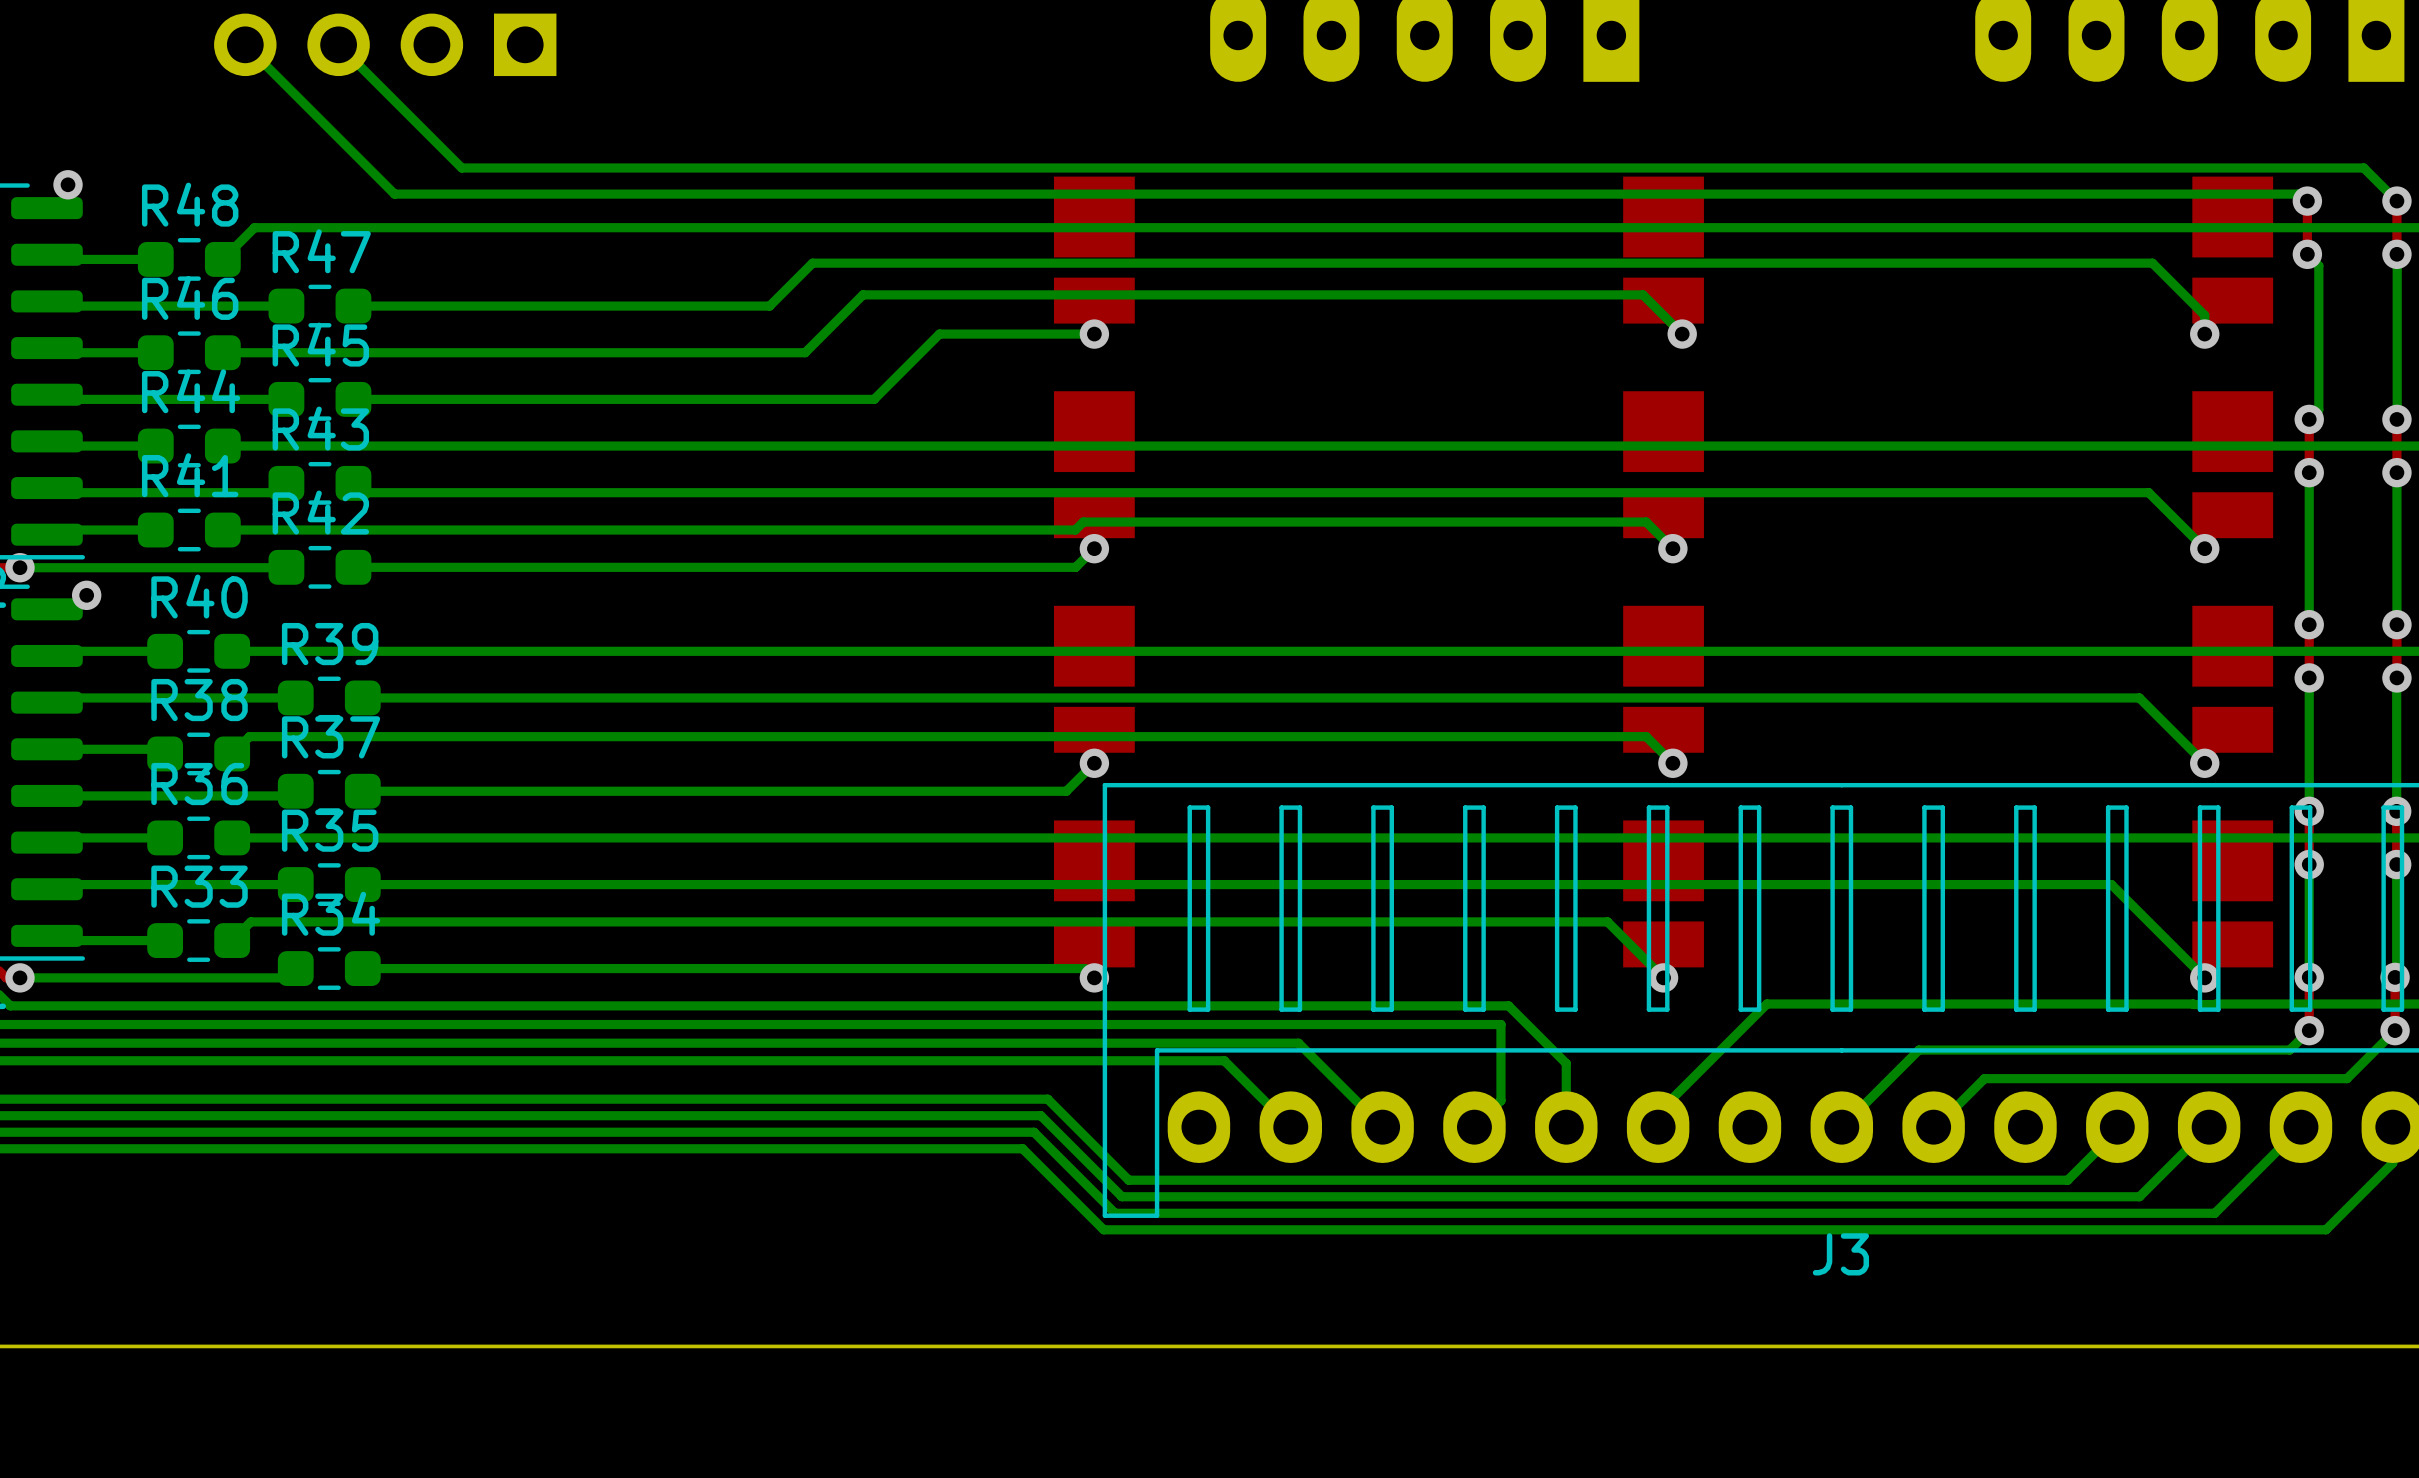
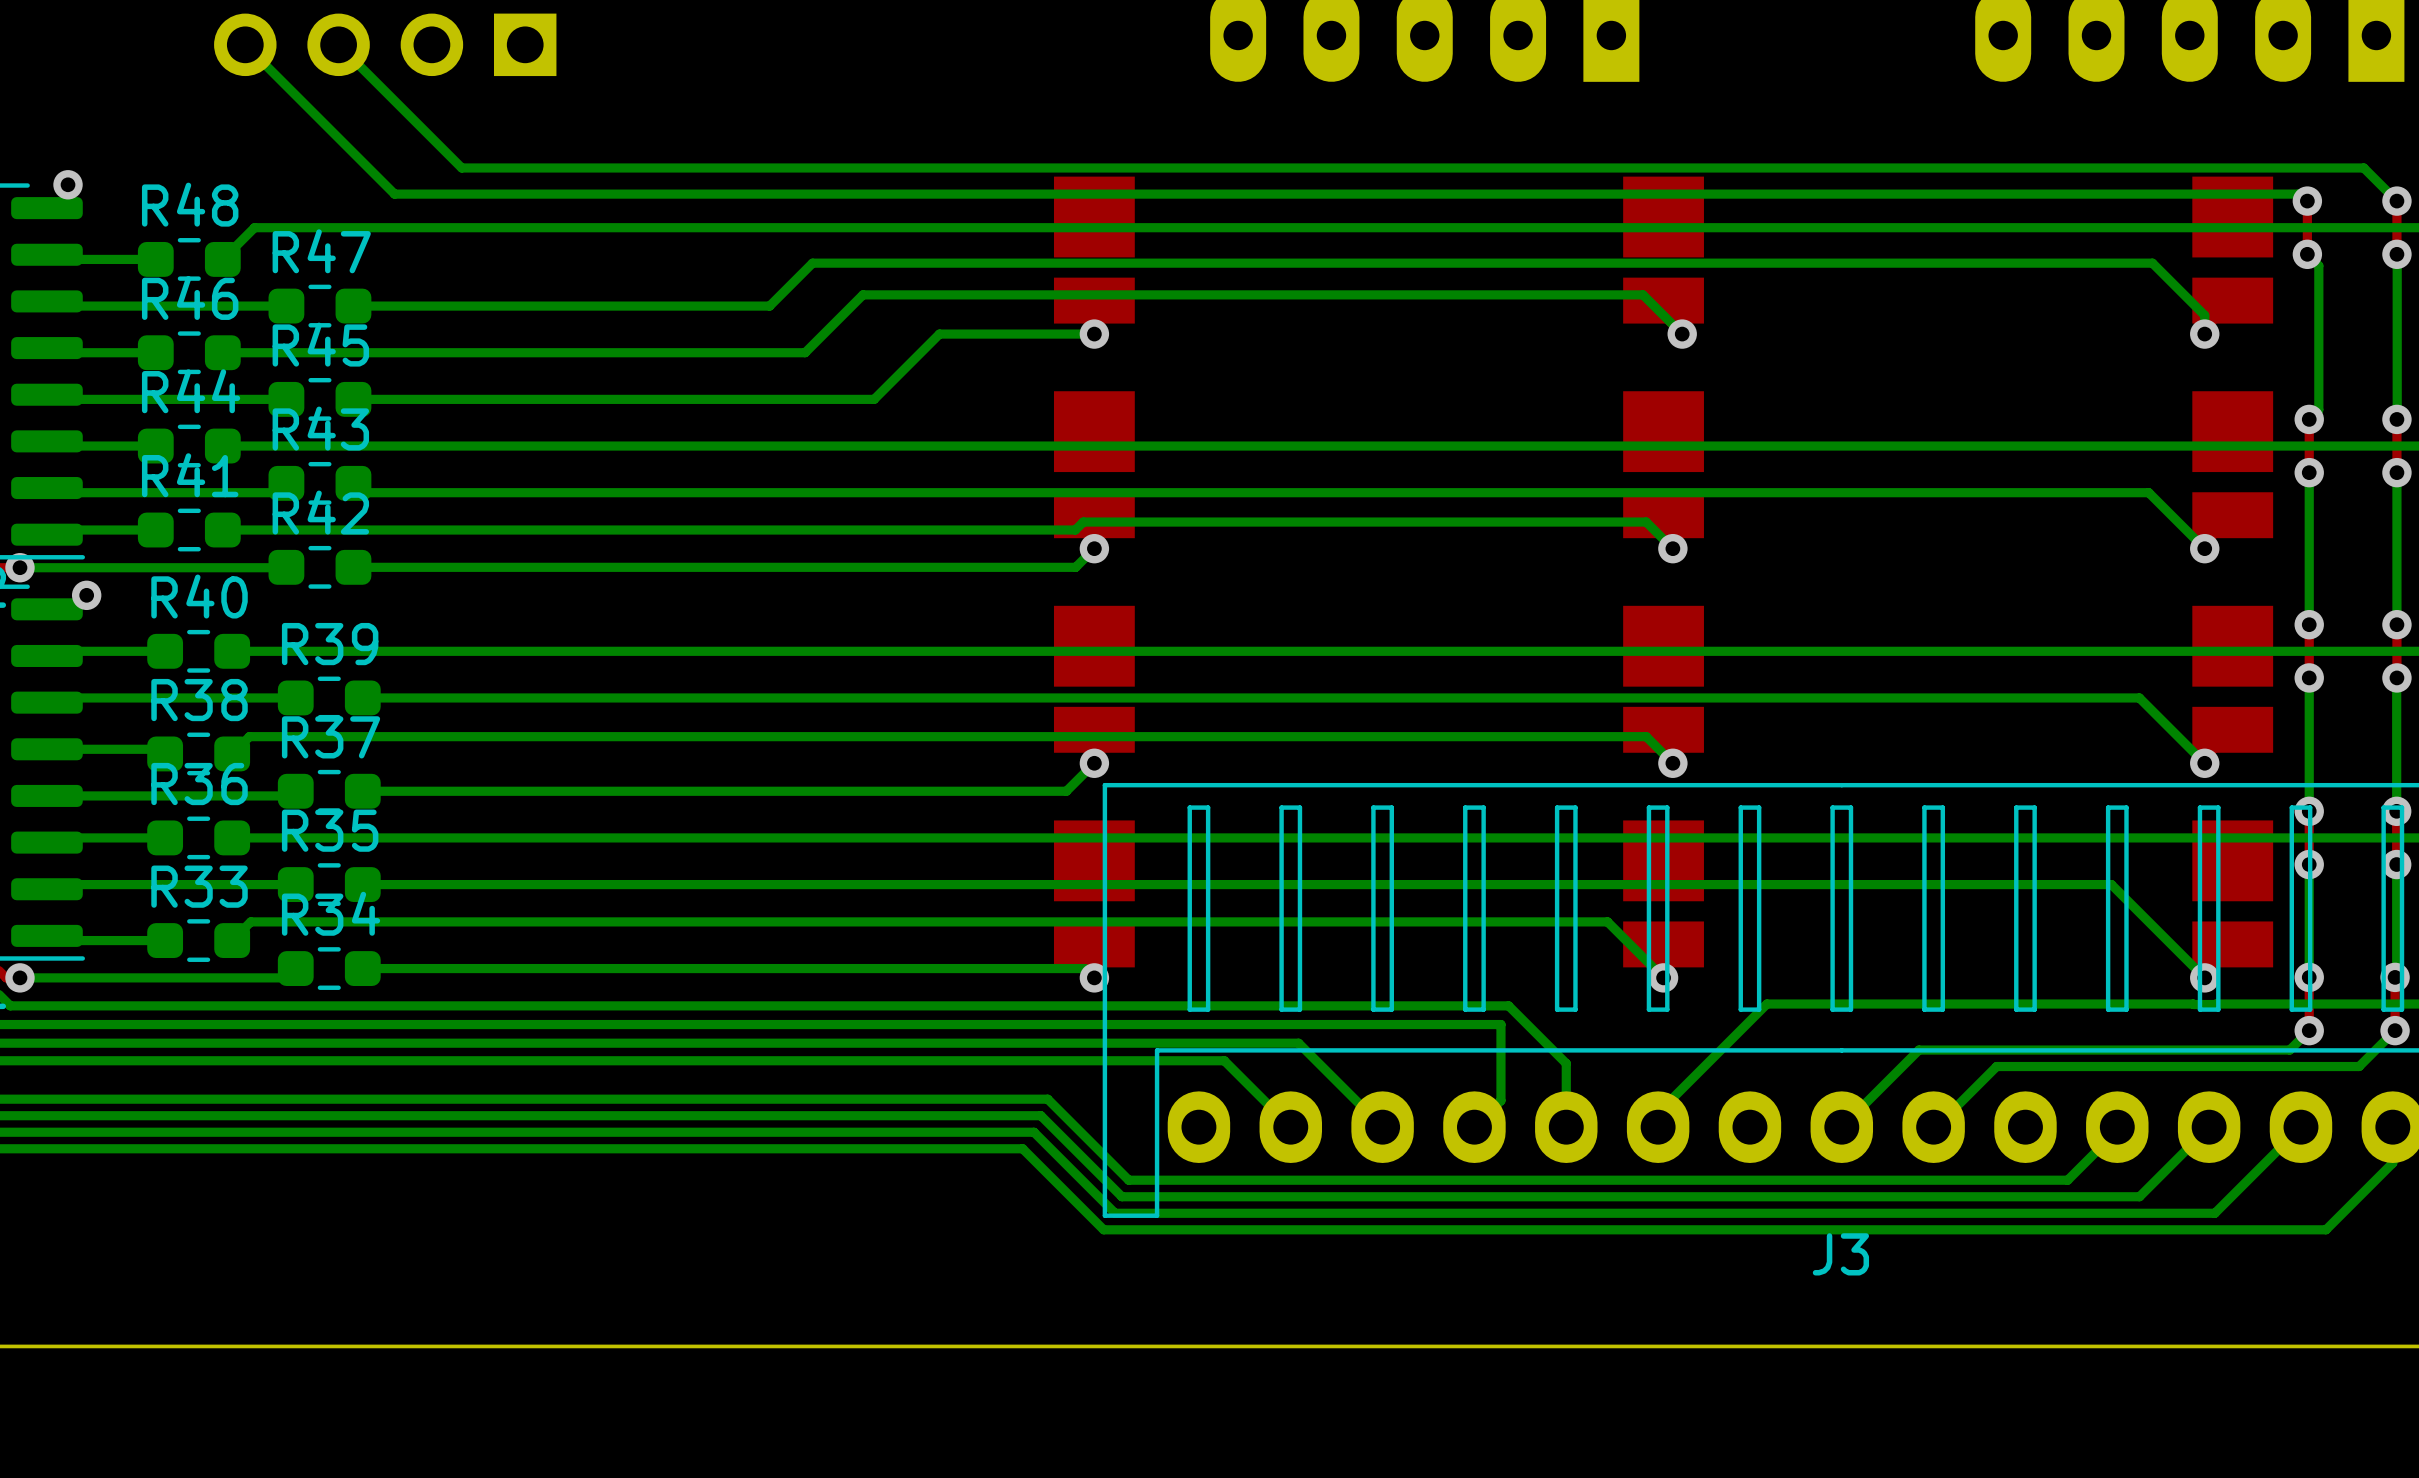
bottom track: (2359, 1066) (2347, 1078) (1984, 1078) -> (2359, 1066) (1996, 1066) (1984, 1078)

